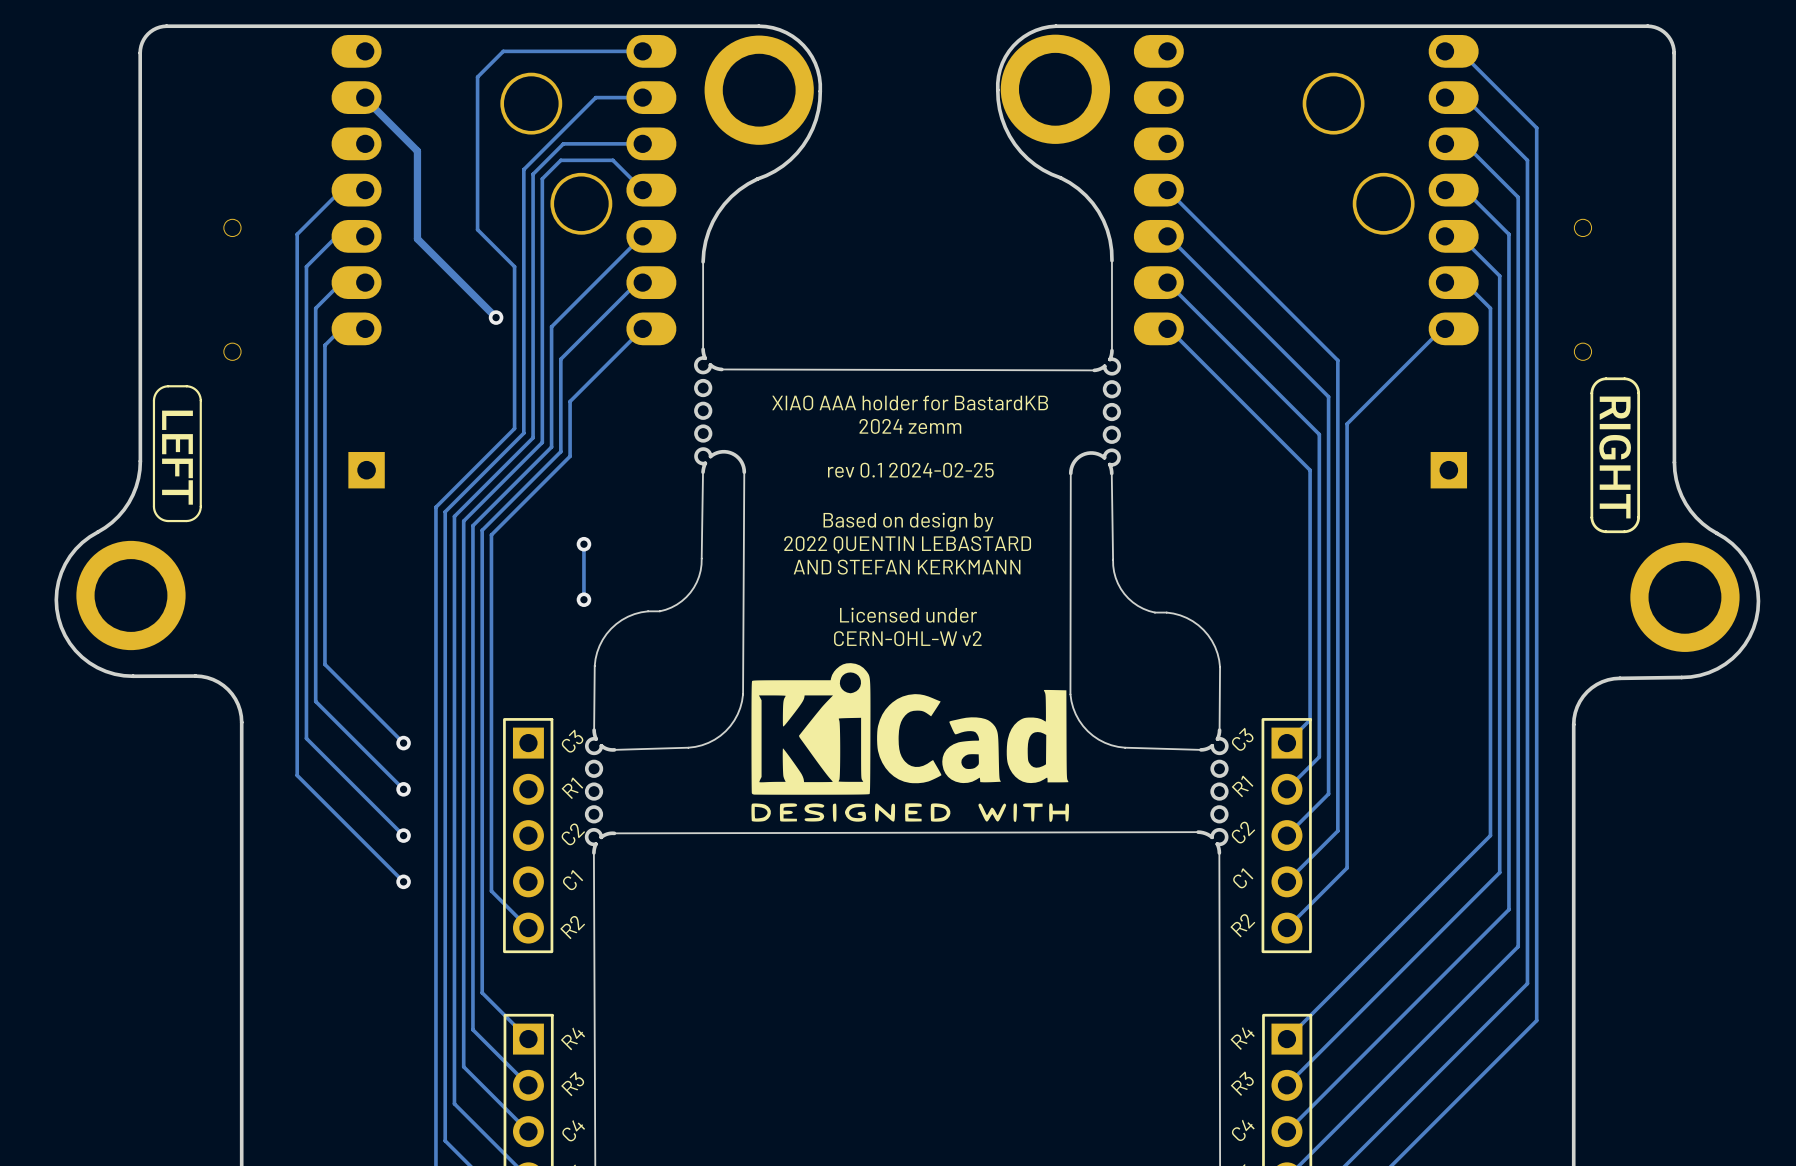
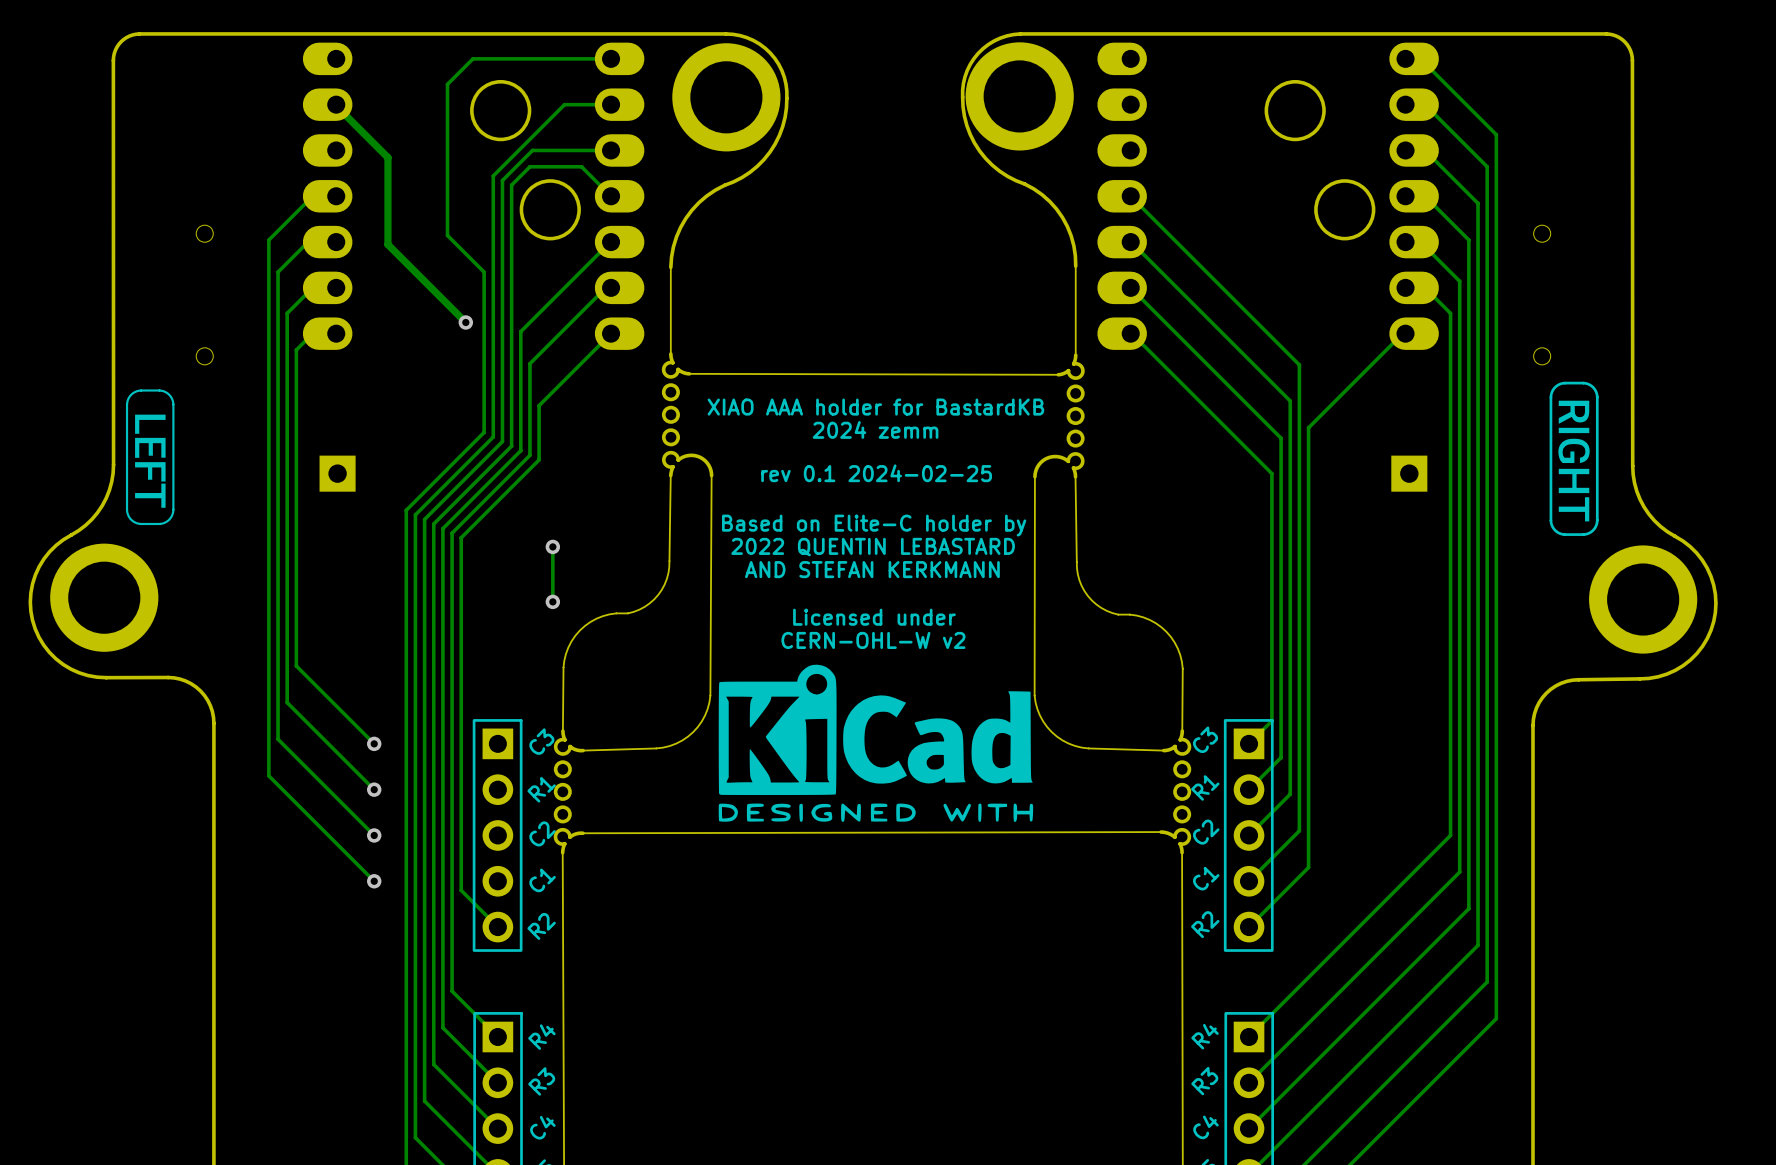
text: Based on design by (908, 522) -> Based on Elite-C holder by (874, 525)

